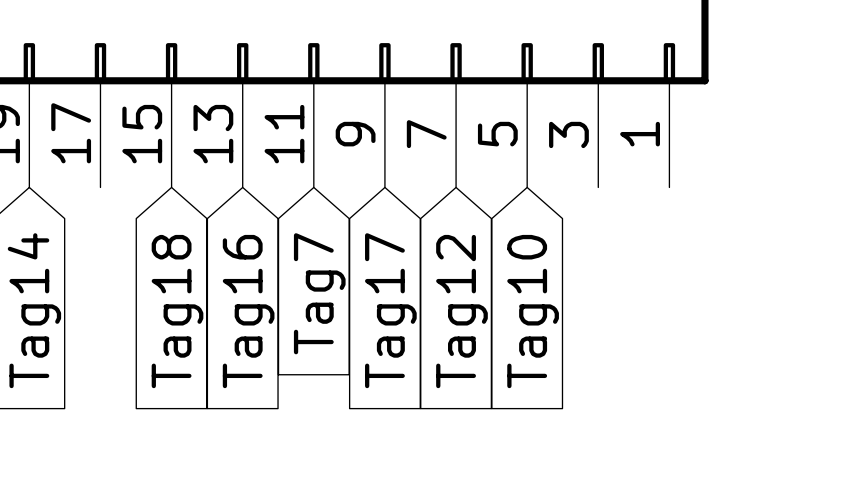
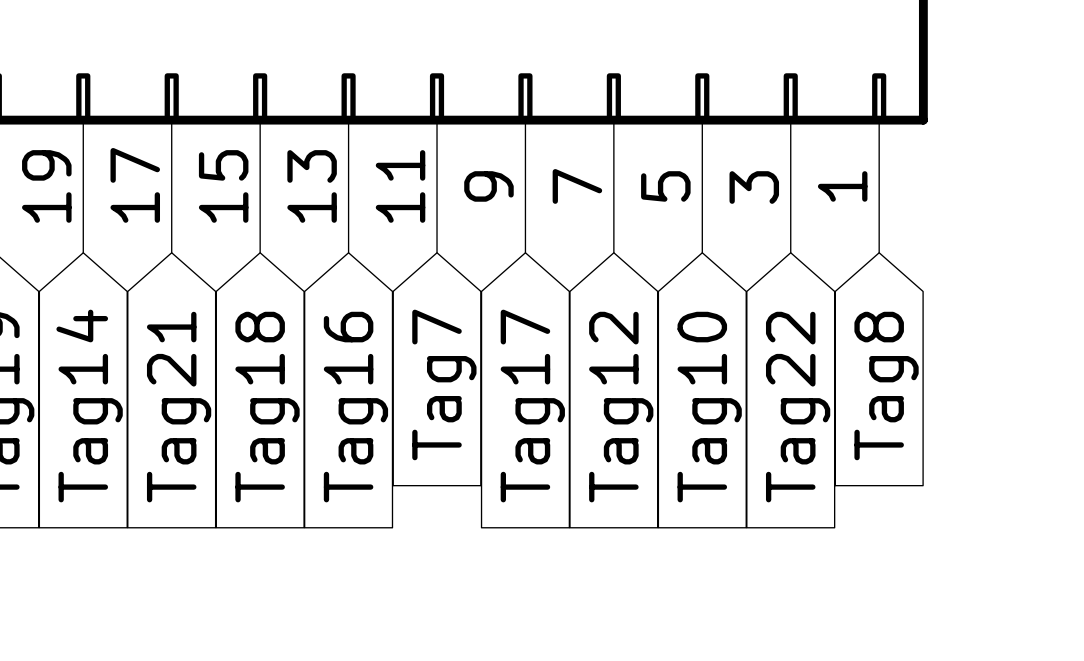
global label: none -> Tag8 (886, 386)
global label: none -> Tag21 (179, 407)
global label: none -> Tag22 (798, 407)

